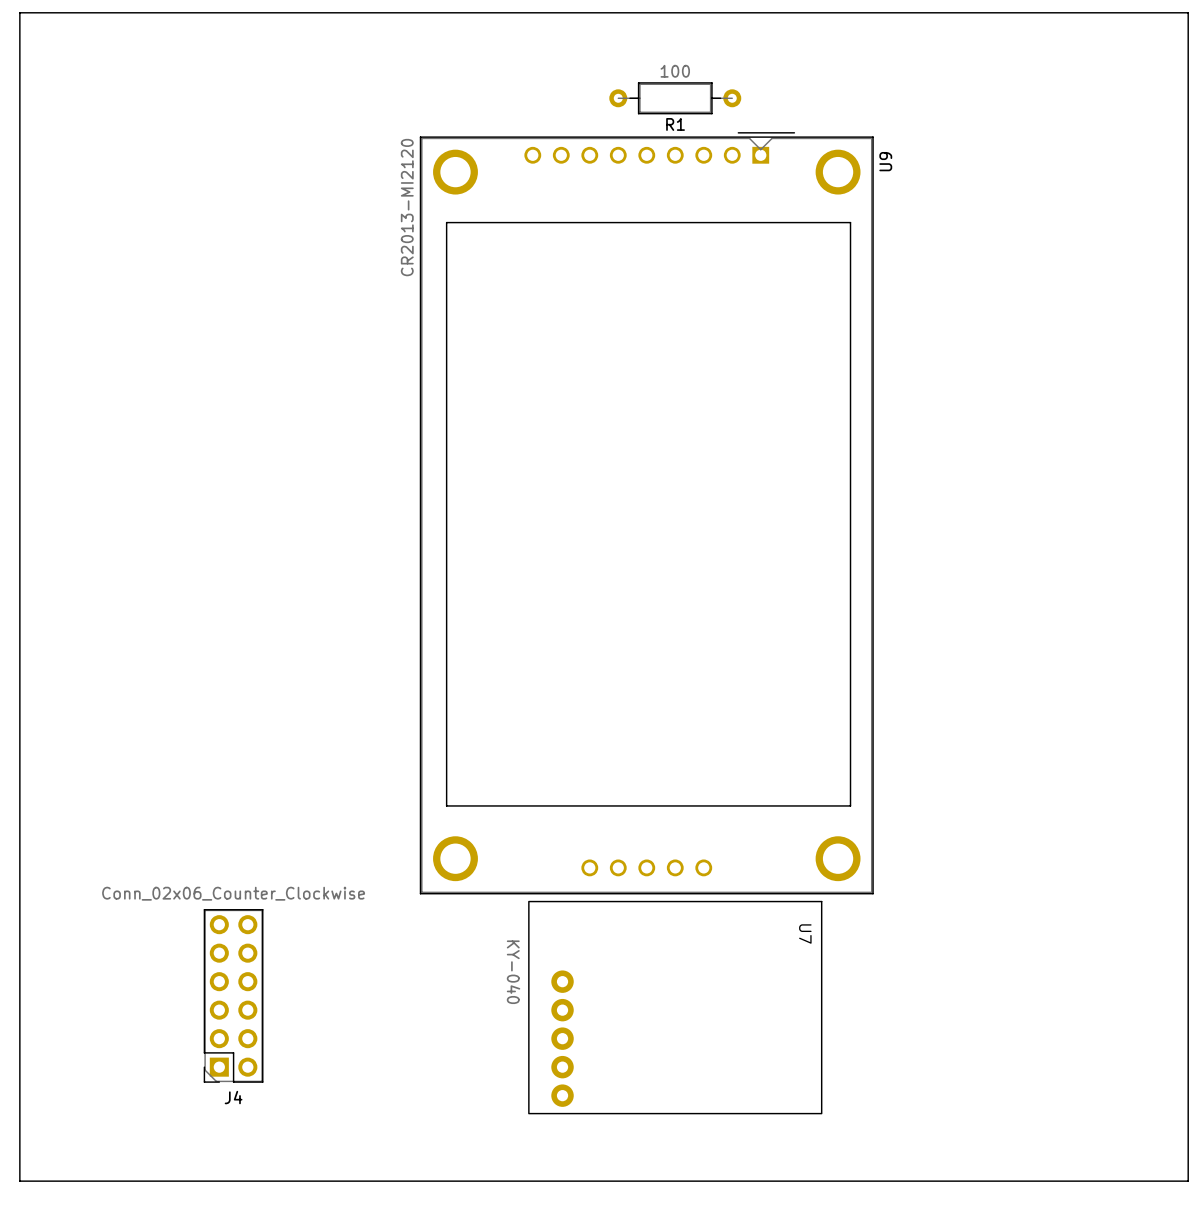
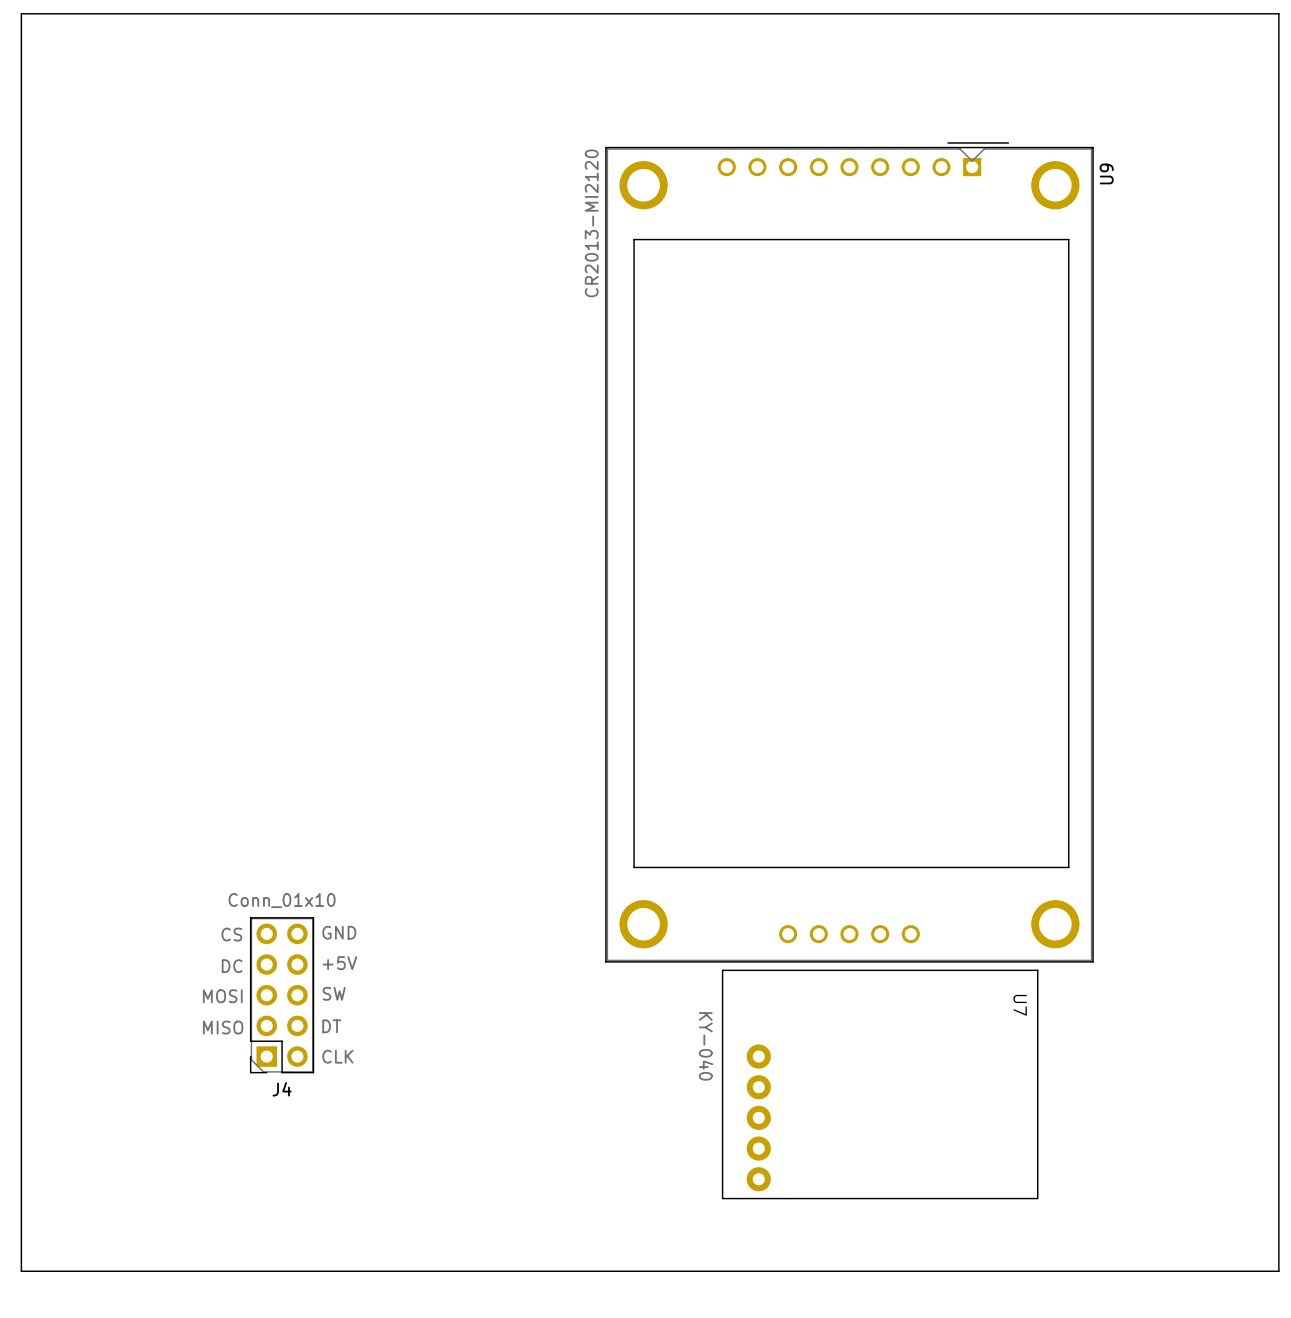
R1: 100 (675, 98) -> none
U9 position: (646, 513) -> (849, 552)
text: none -> GND (339, 932)
text: none -> CS (231, 934)
J4 value: Conn_02x06_Counter_Clockwise (233, 893) -> Conn_01x10 (282, 900)
text: none -> +5V (339, 963)
text: none -> DC (232, 966)
J4 footprint: [203, 909, 264, 1083] -> [249, 917, 315, 1074]
text: none -> SW (334, 993)
text: none -> MOSI (222, 996)
text: none -> DT (331, 1026)
text: none -> MISO (223, 1027)
text: none -> CLK (337, 1056)
U7 position: (675, 1007) -> (880, 1084)

